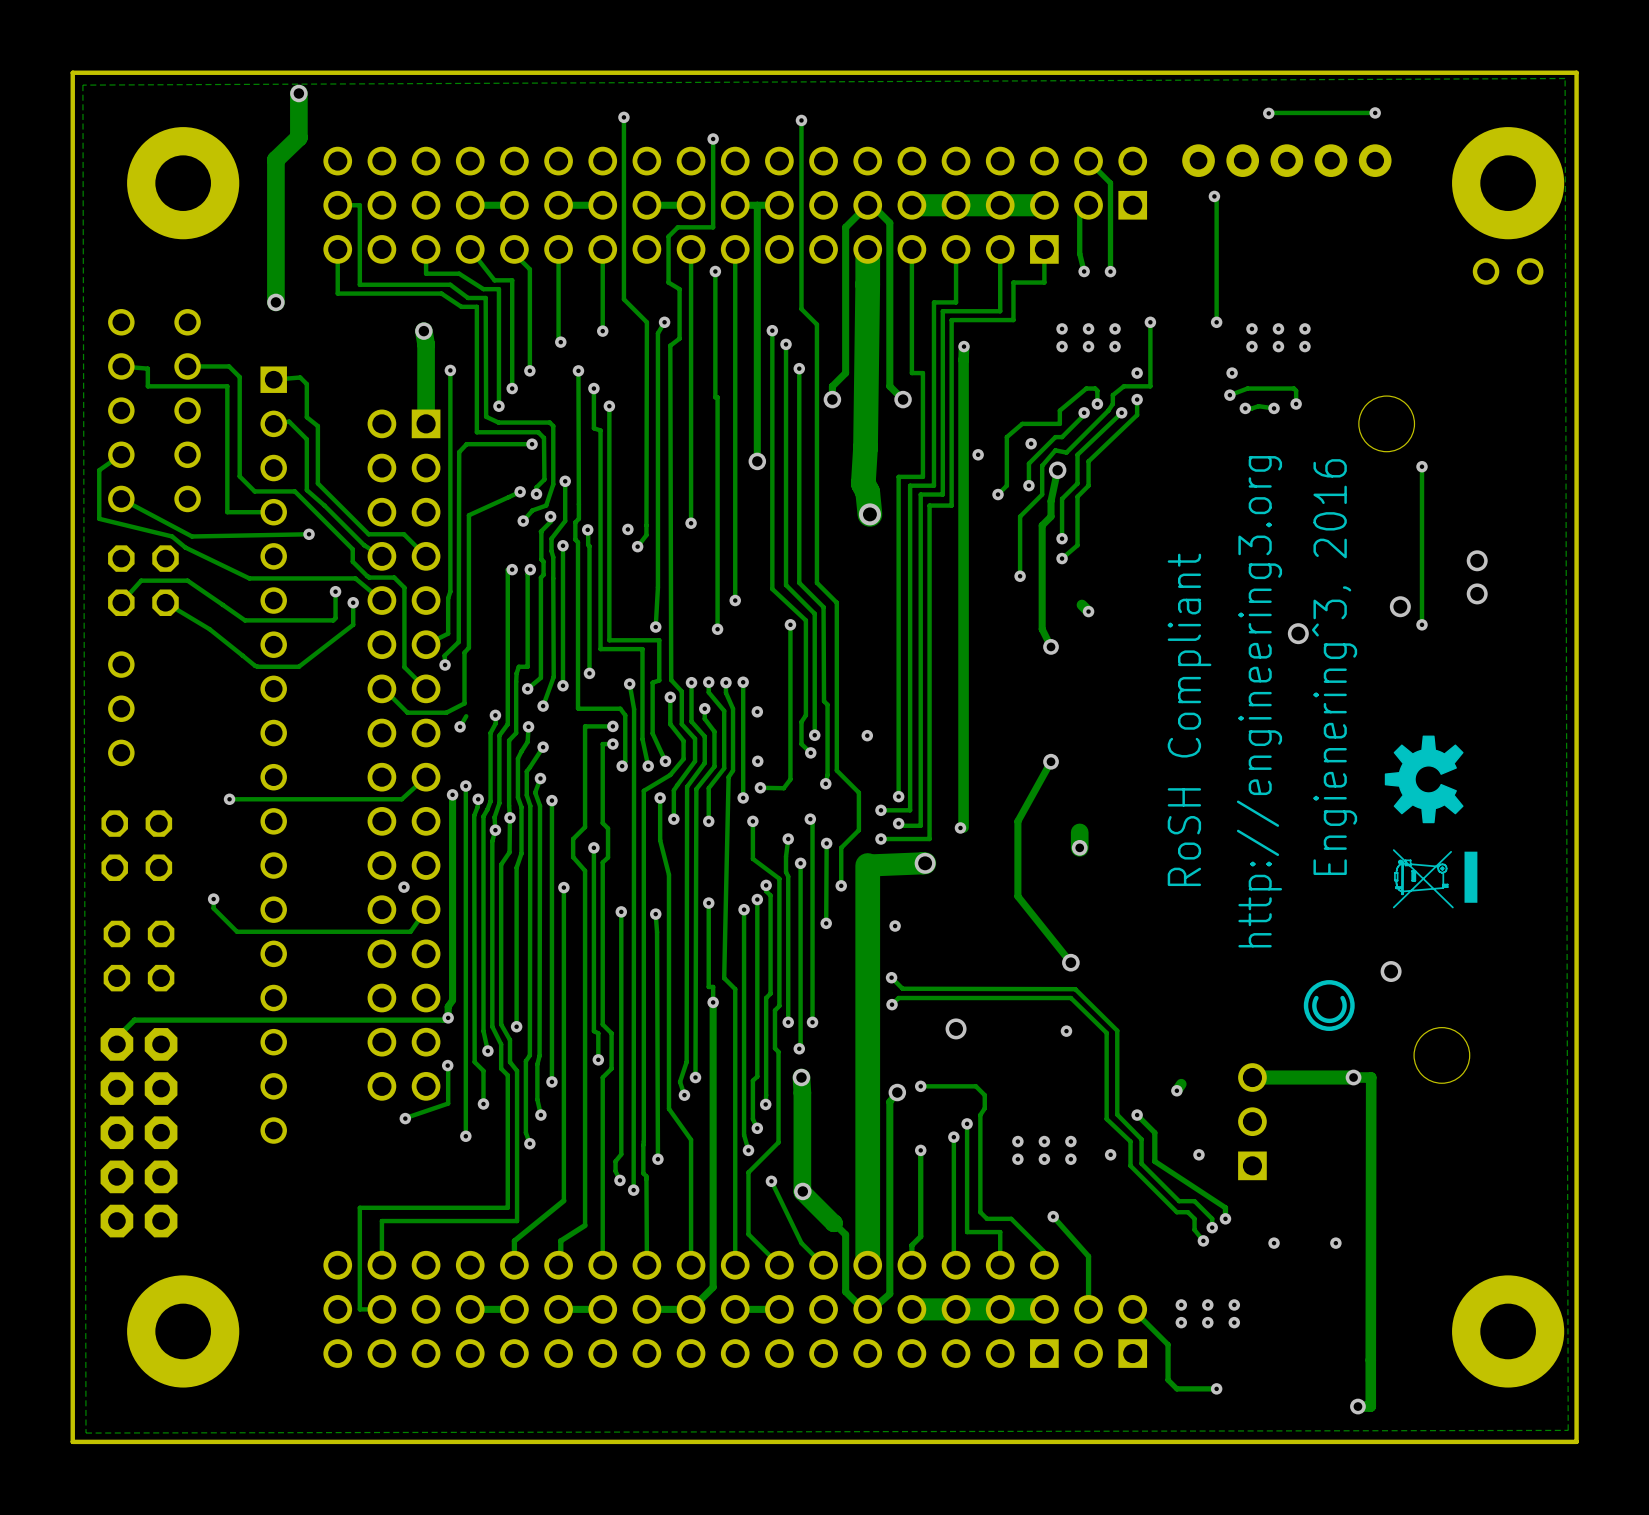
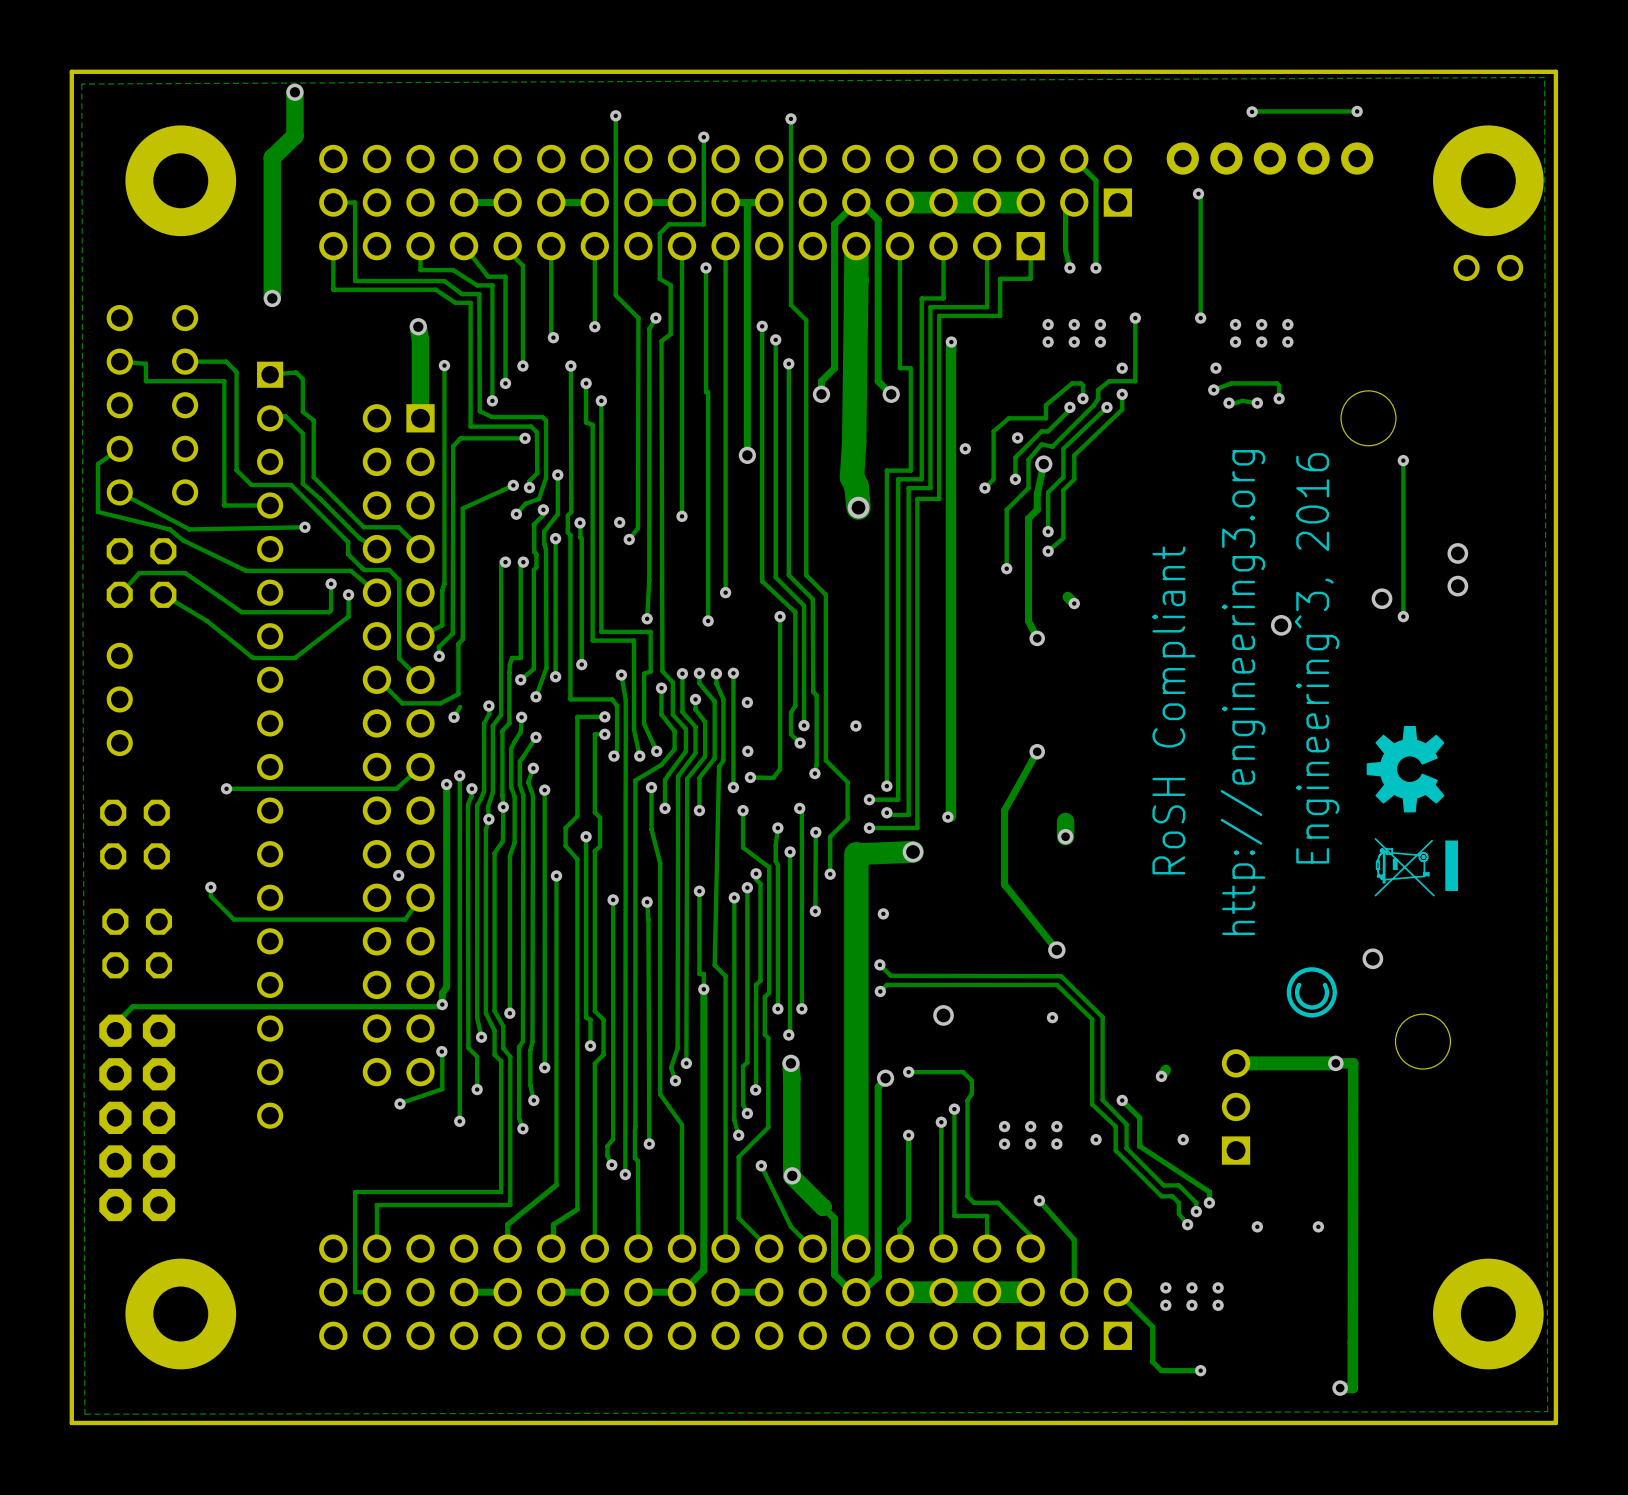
text: Engienering^3, 2016 (1334, 667) -> Engineering^3, 2016 (1317, 658)

